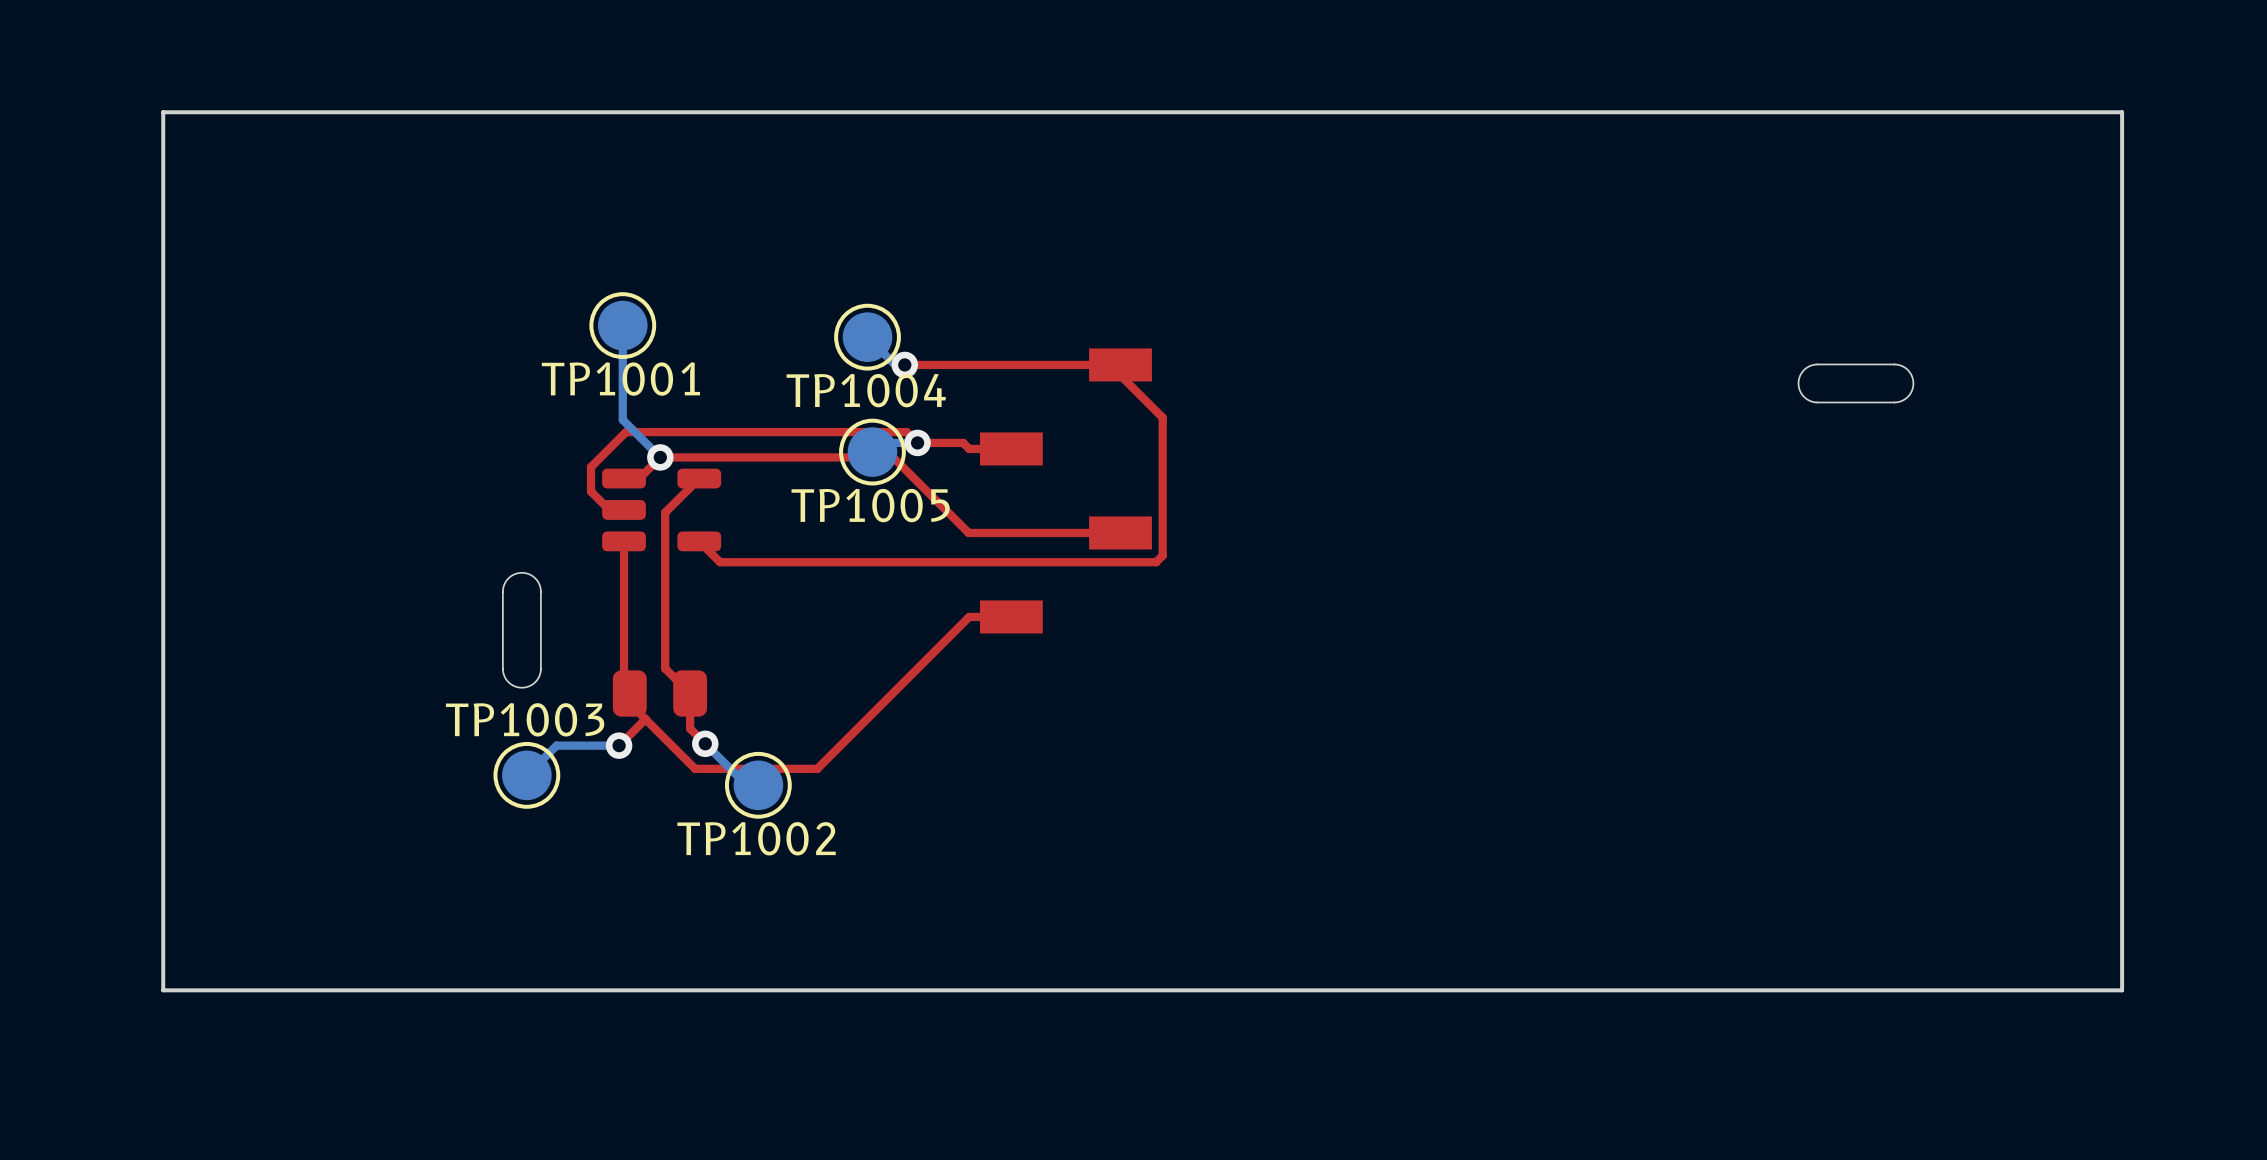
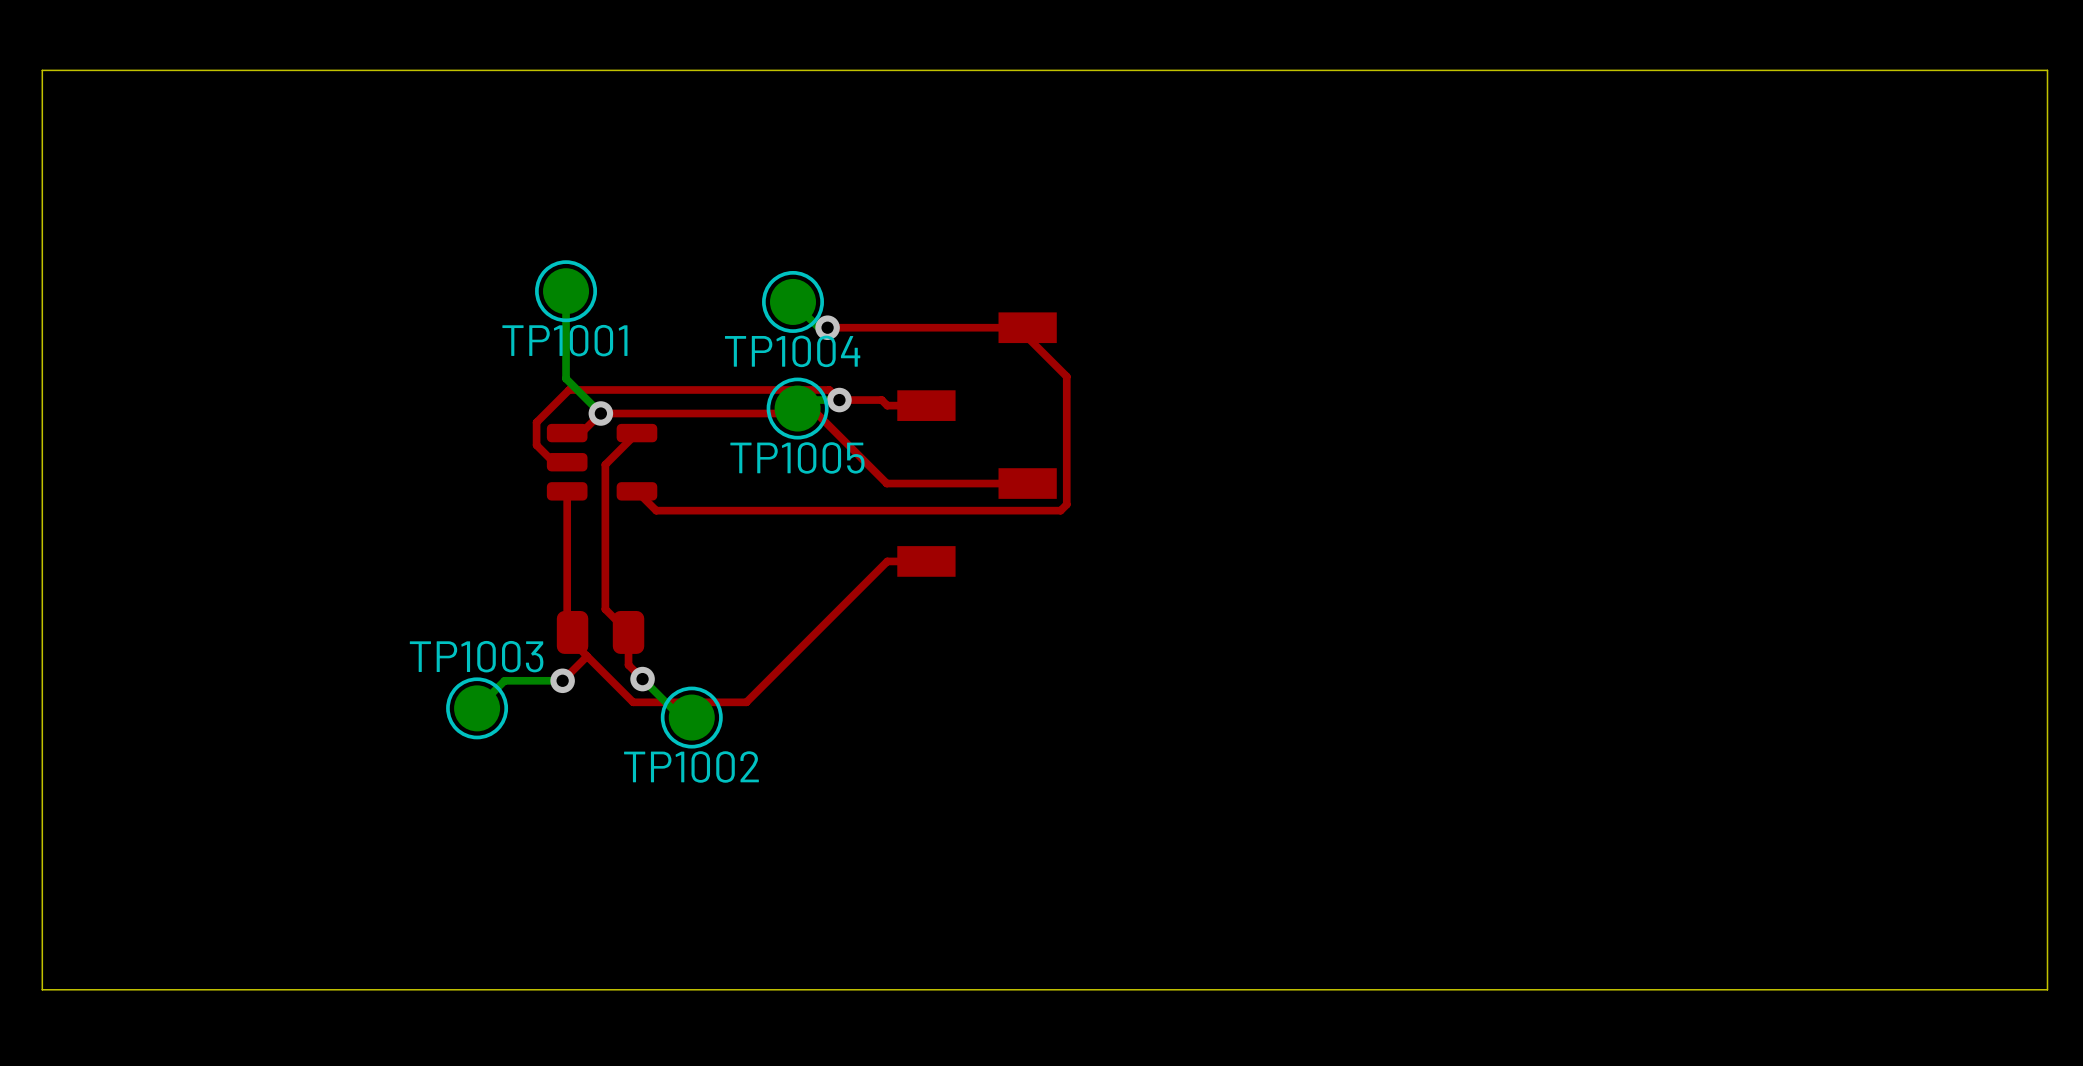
board edge: none -> (2047, 70) (2047, 989) (42, 989) (42, 70) (2047, 70)
drawing: [161, 110, 2125, 993] -> none
board edge: (1894, 364) (1812, 365) (1801, 373) (1799, 388) (1804, 396) (1815, 402) (1899, 401) (1910, 392) (1913, 380) (1907, 370) (1894, 364) -> none
board edge: (540, 591) (540, 673) (531, 685) (516, 687) (508, 682) (503, 671) (503, 586) (510, 576) (524, 572) (535, 578) (540, 591) -> none

